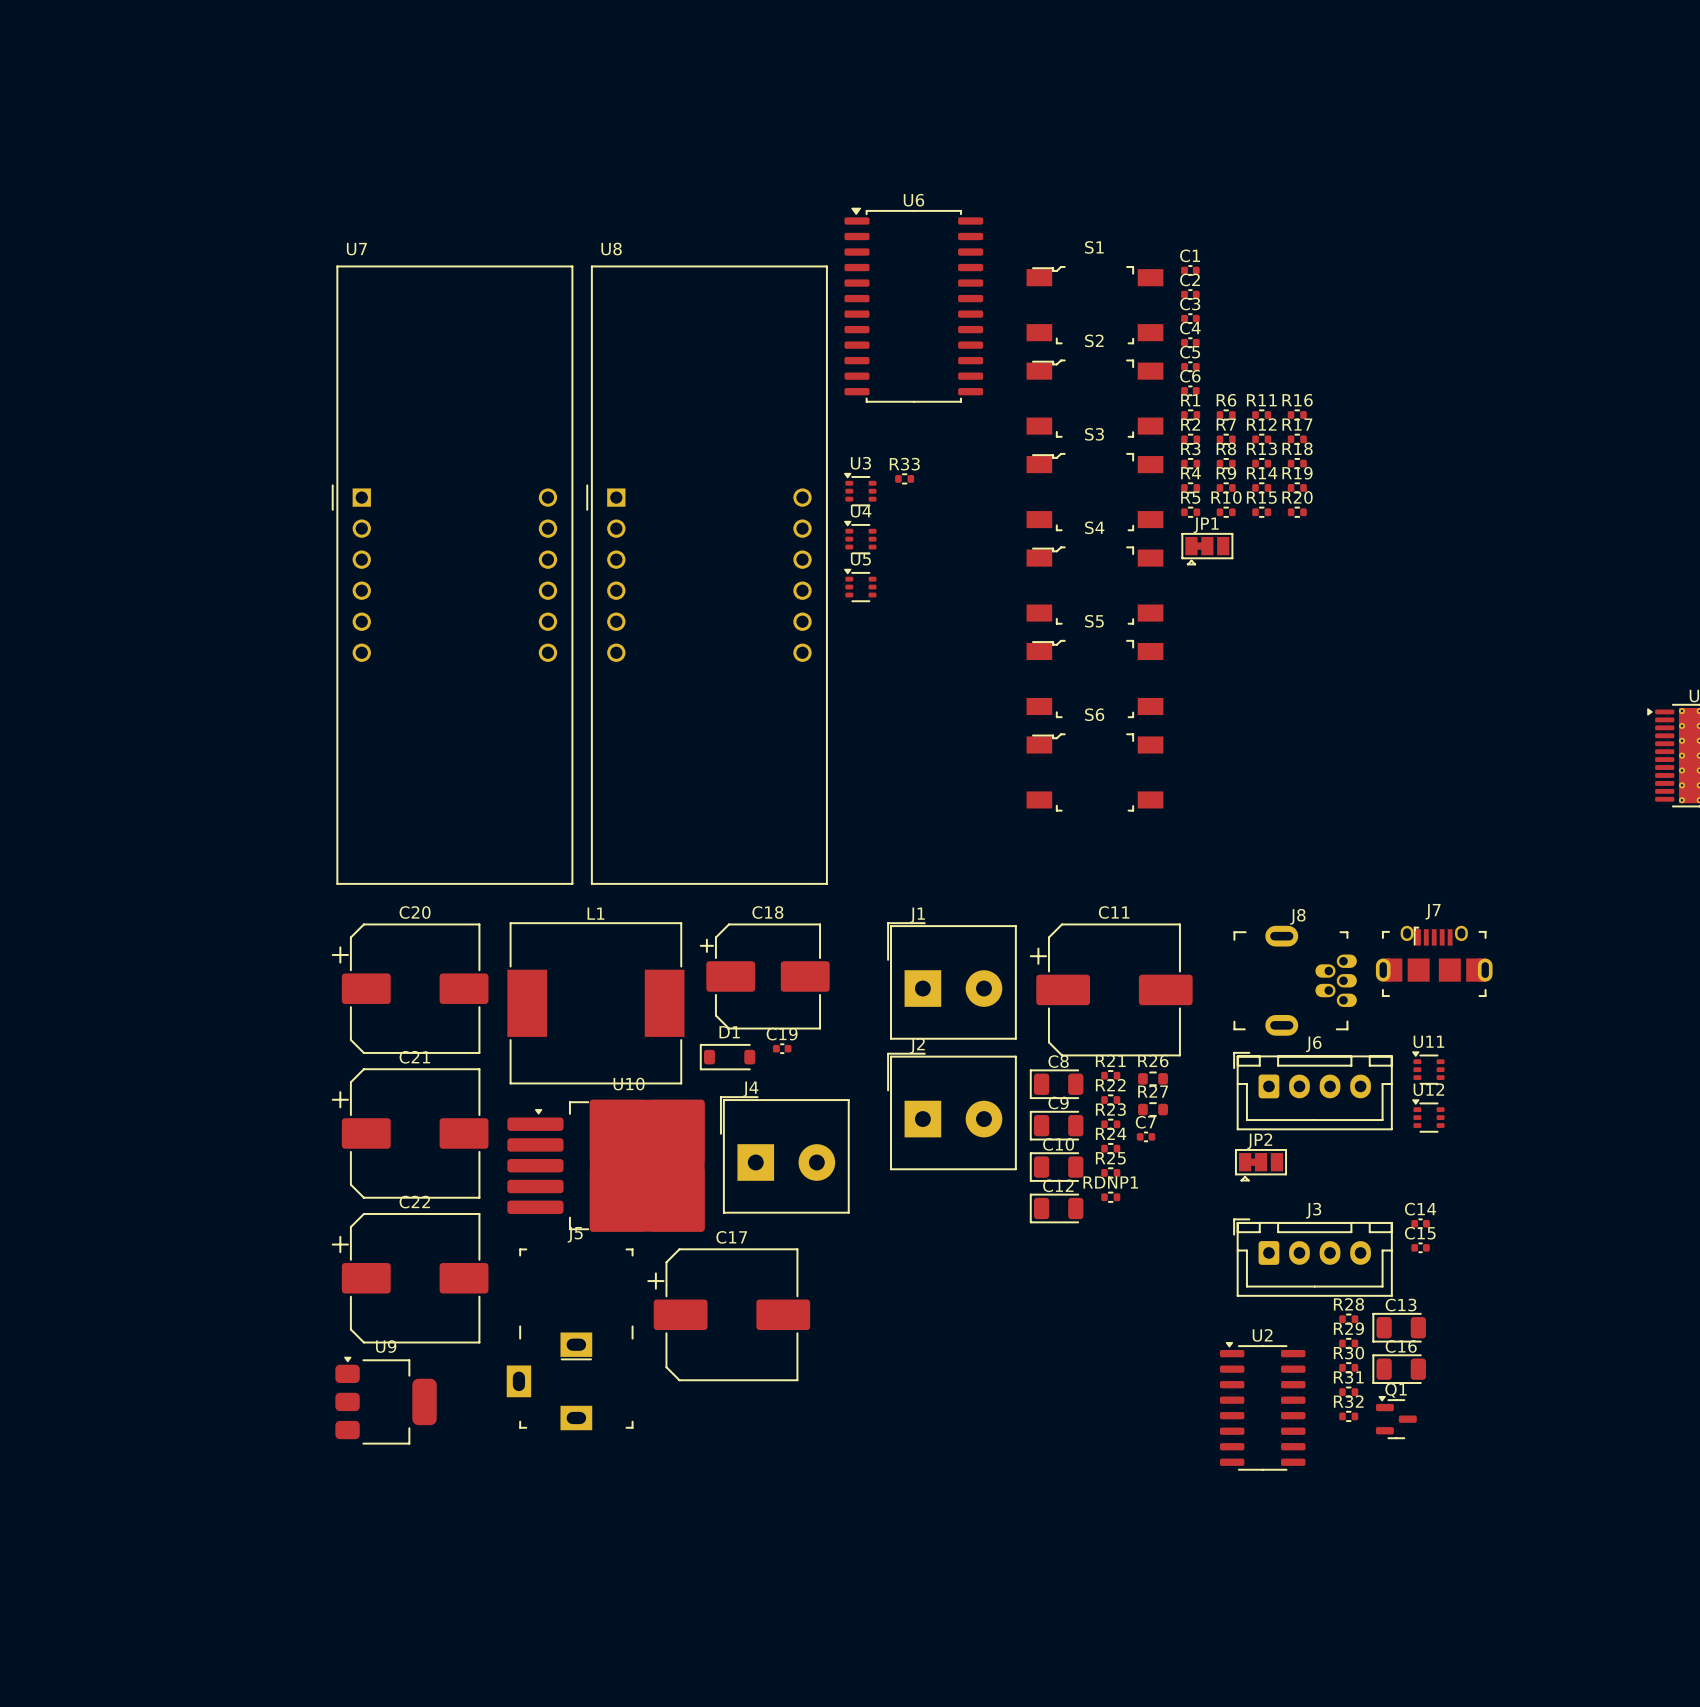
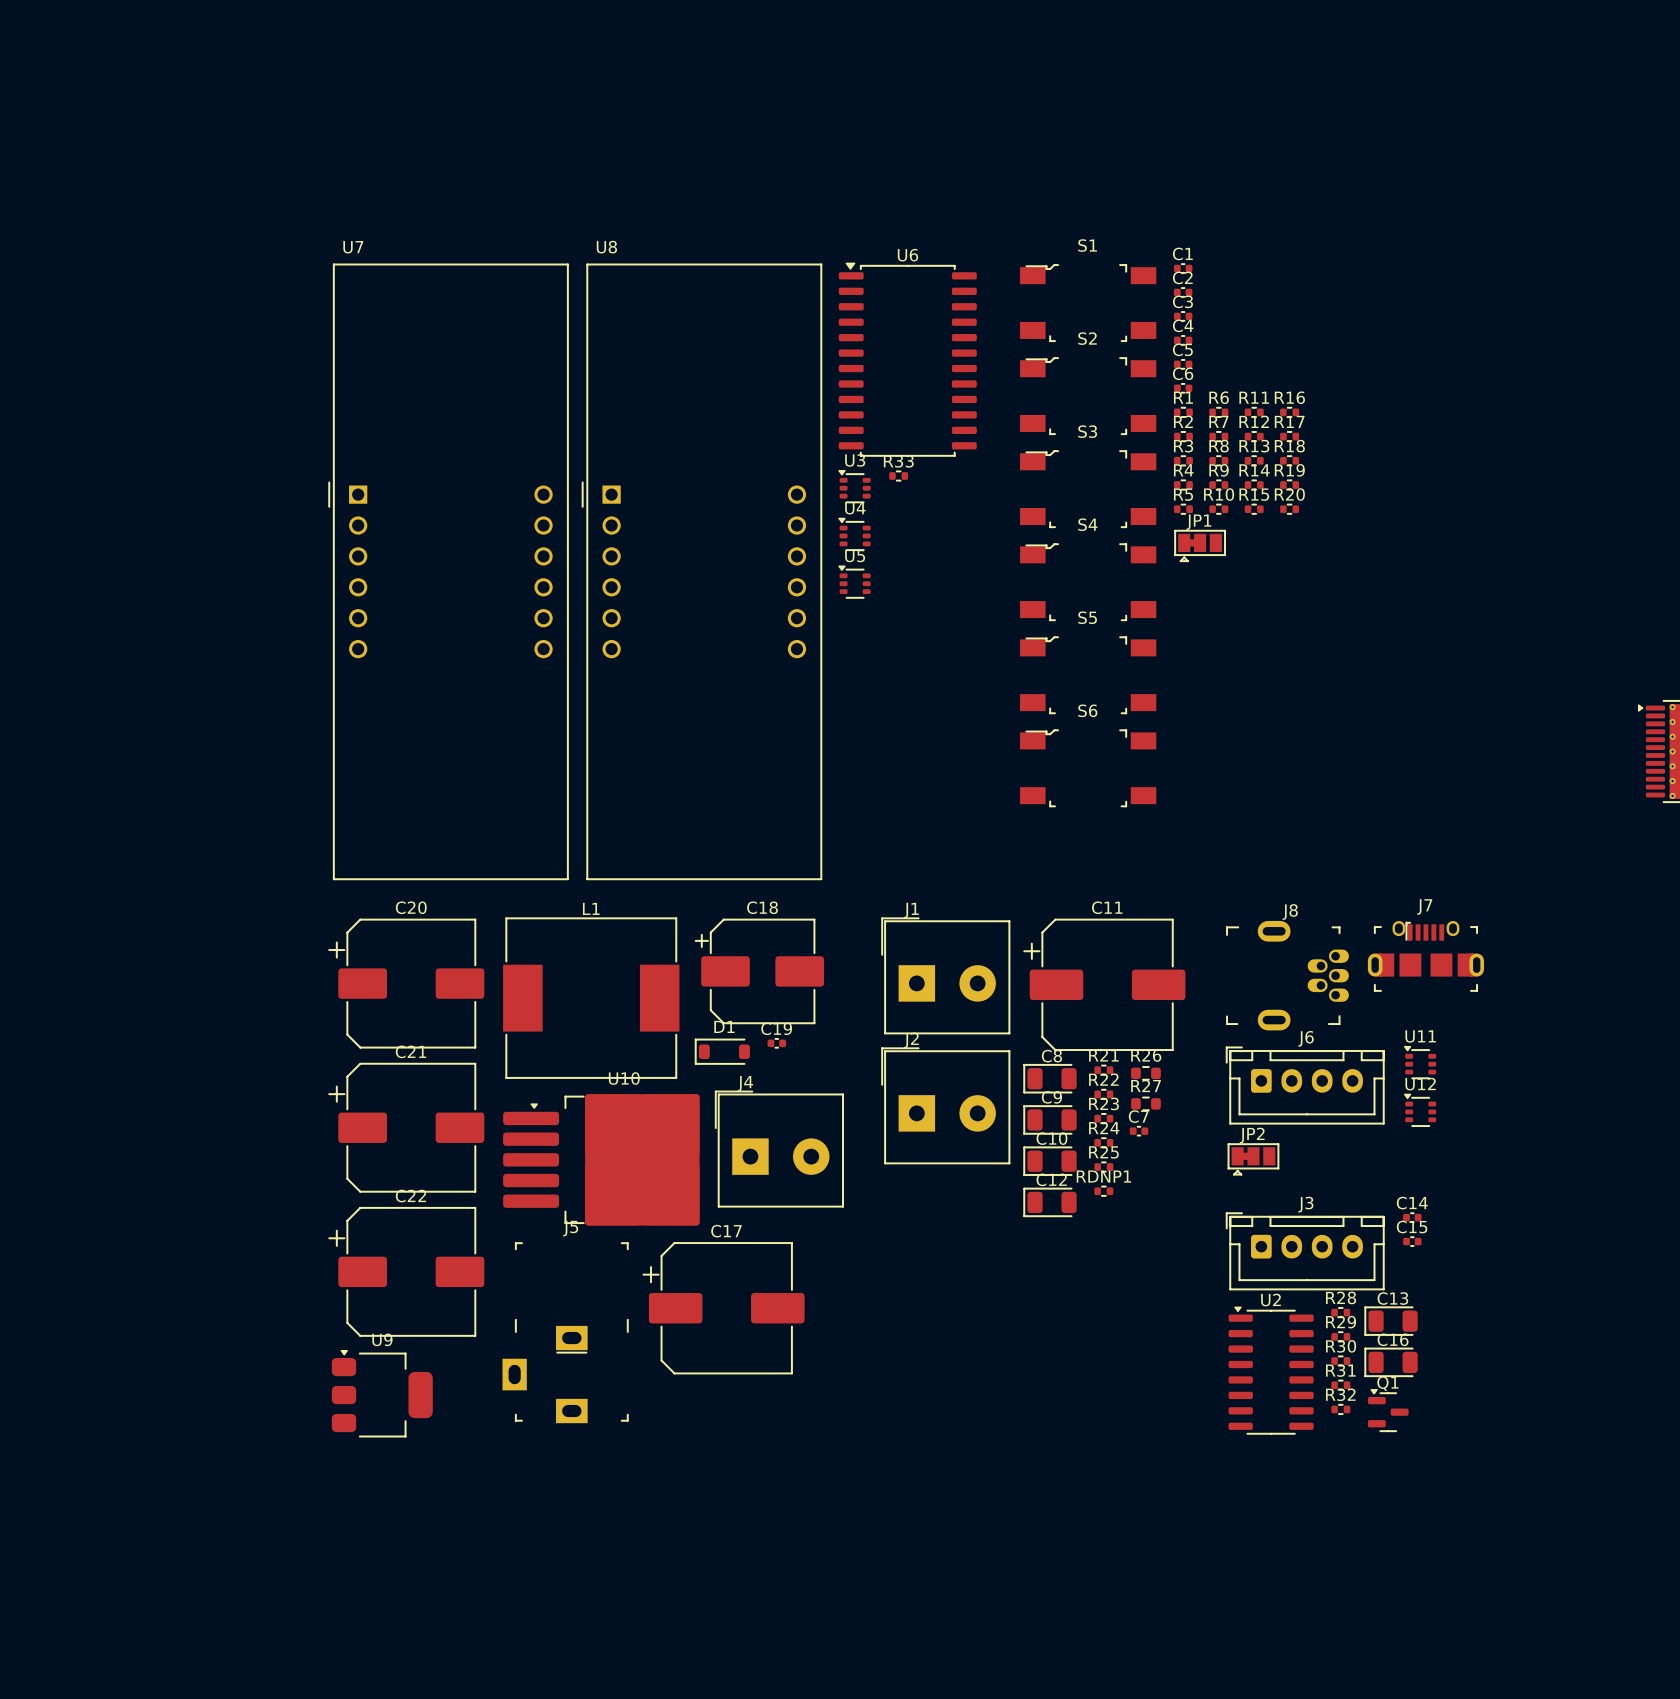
U6 position: (913, 305) -> (907, 359)
U2 position: (1262, 1406) -> (1271, 1370)

